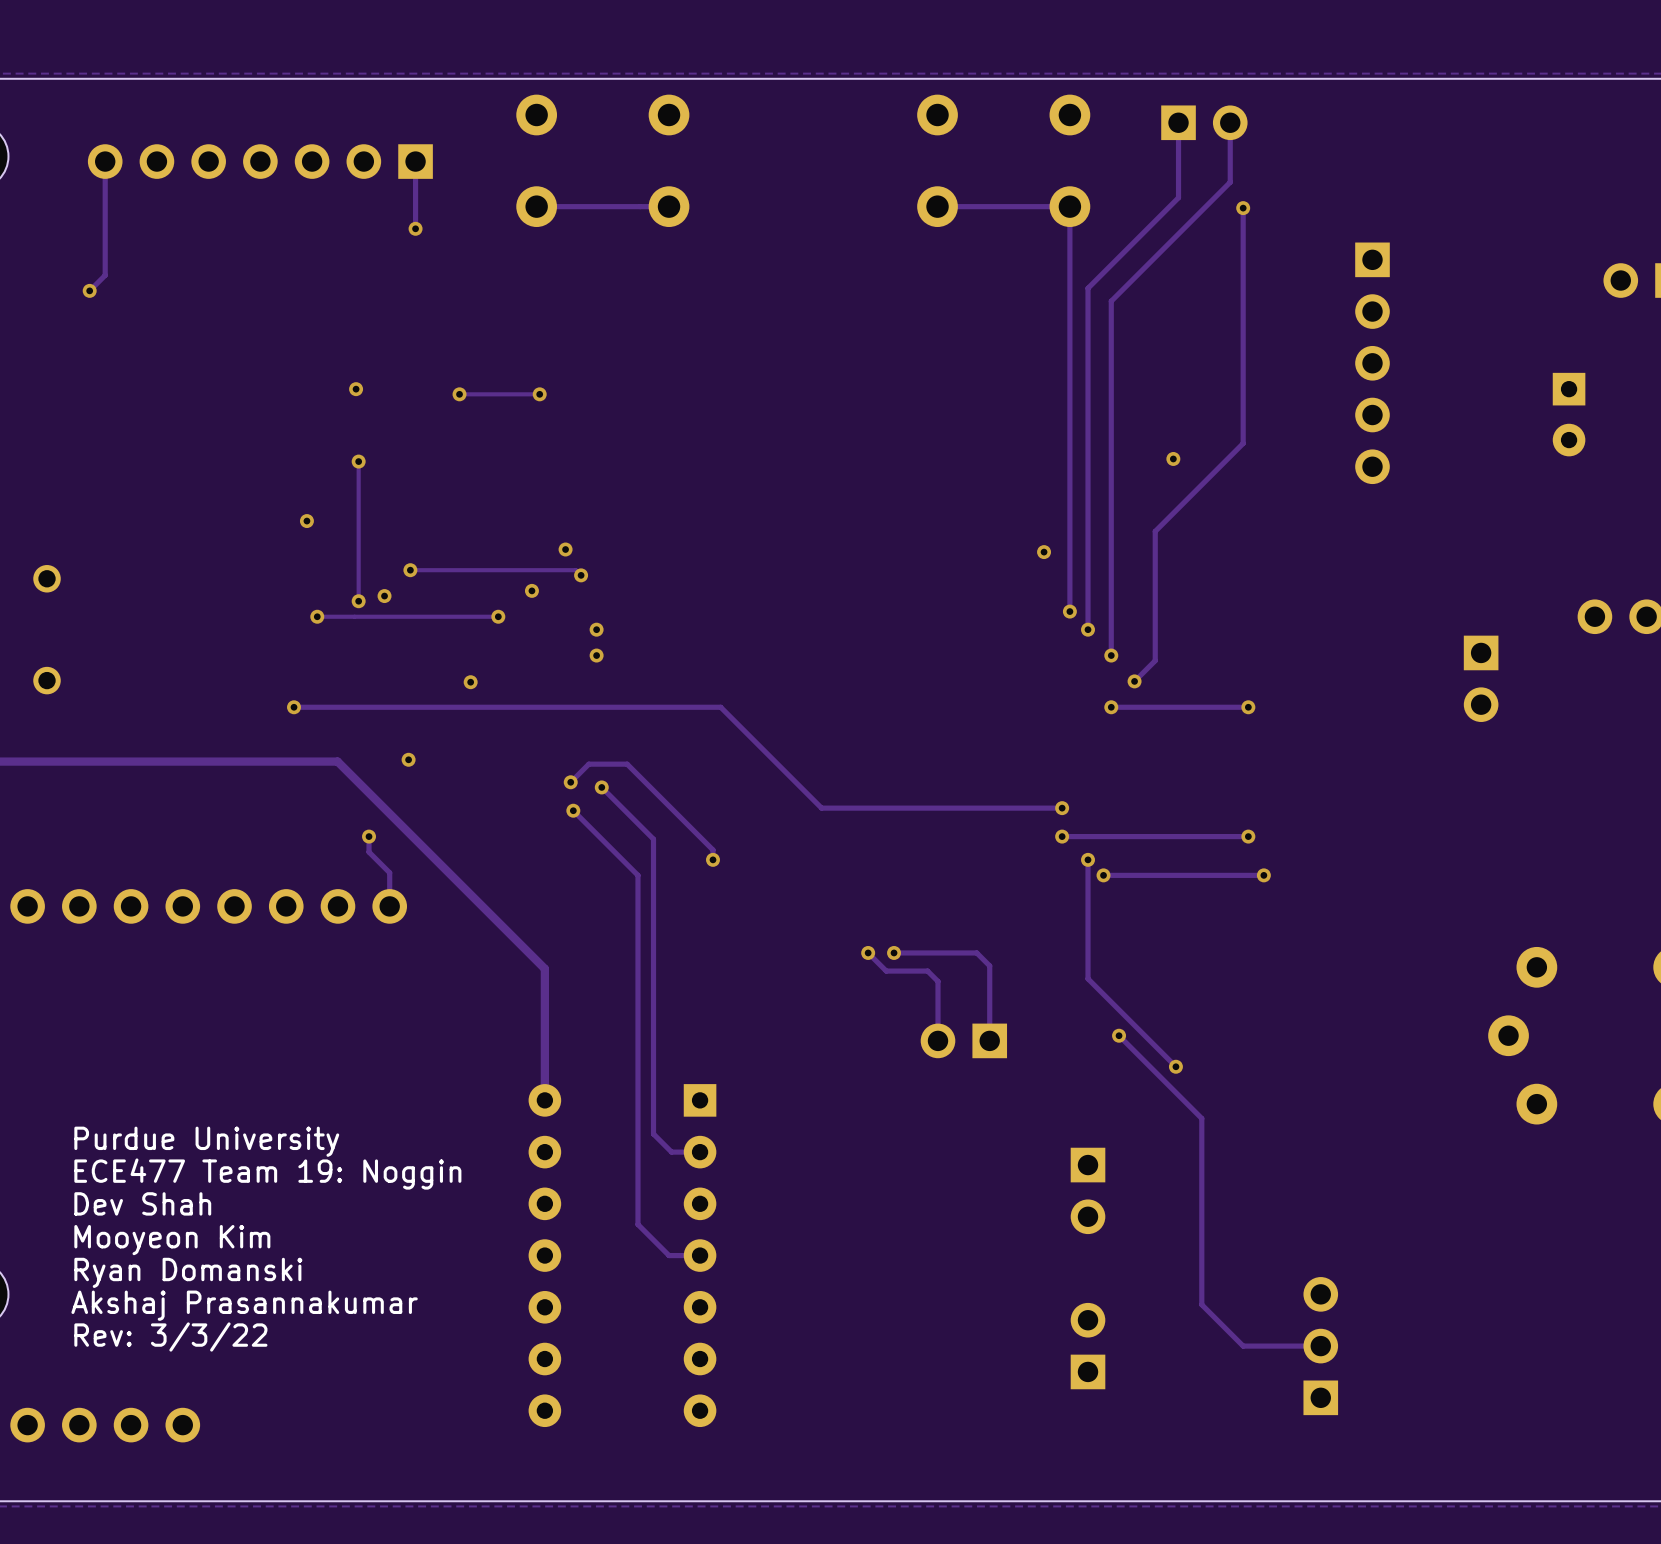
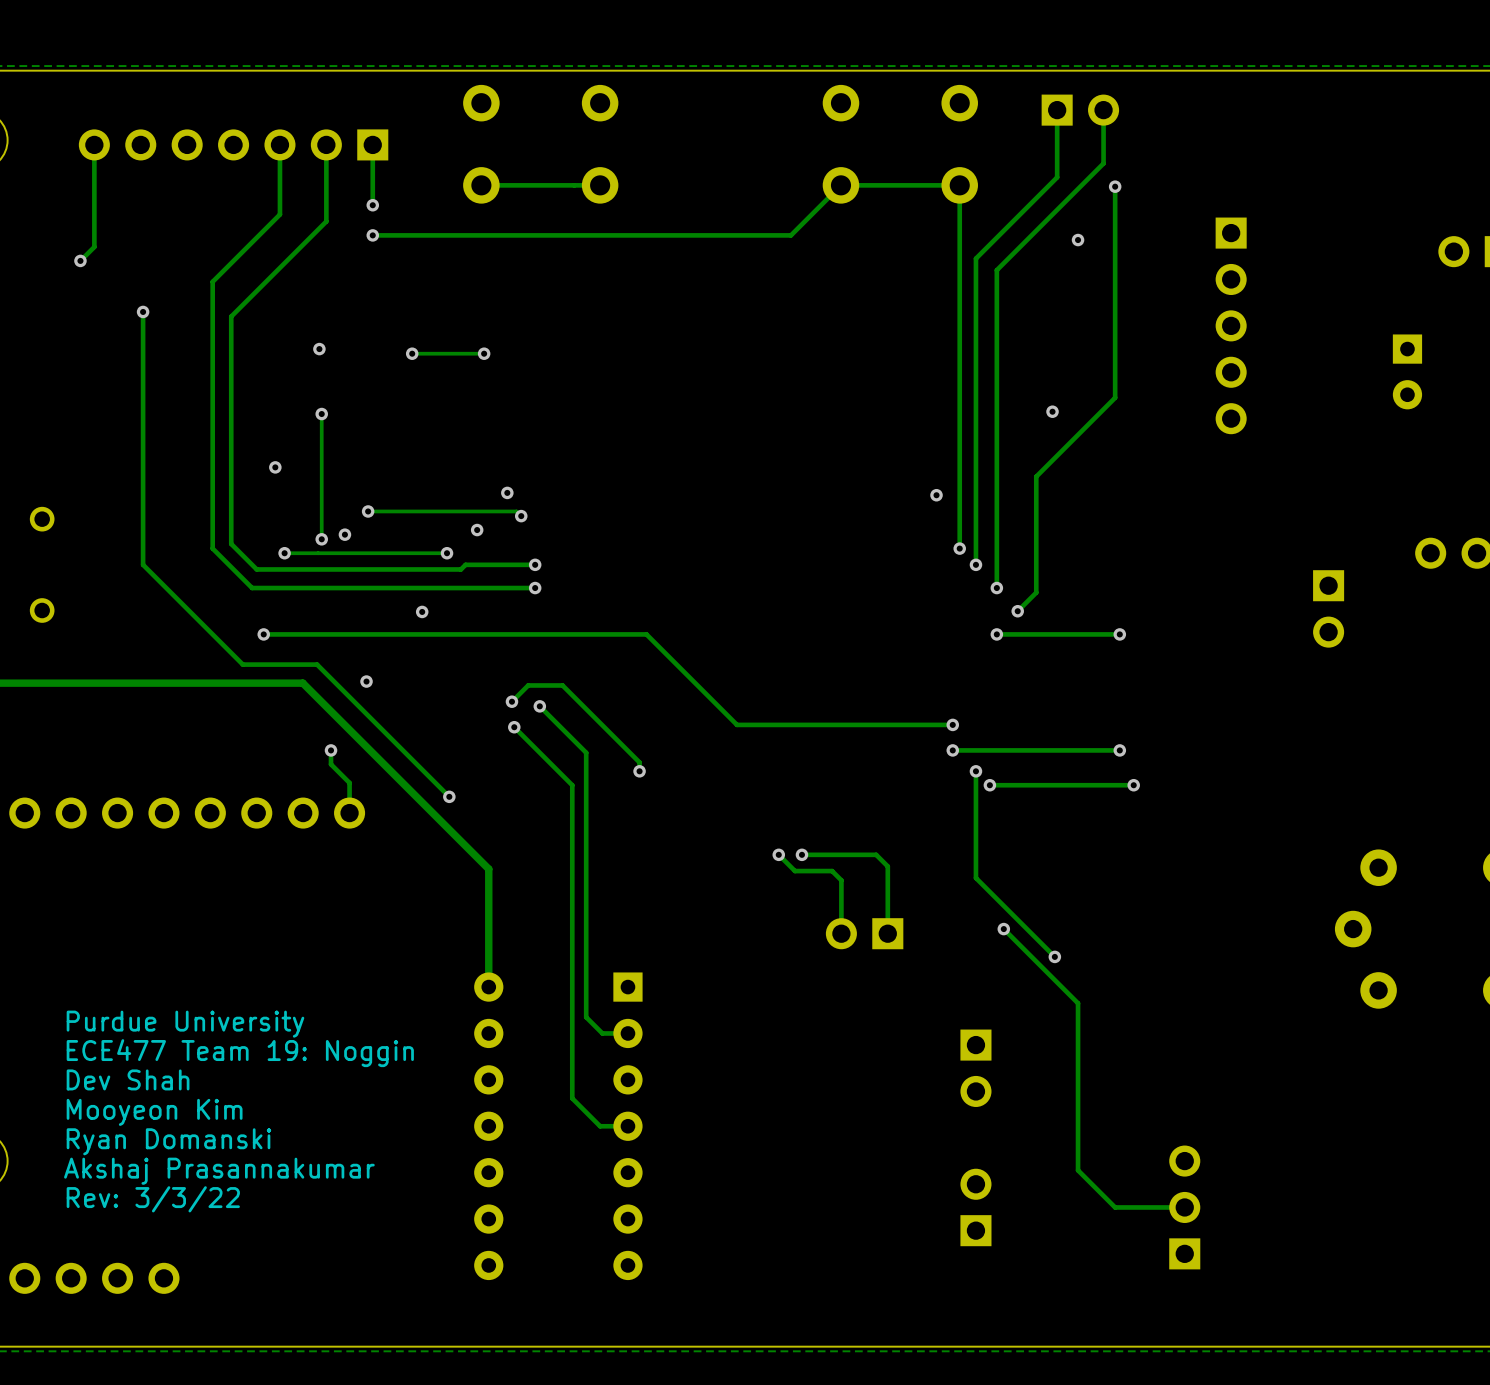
track: none -> (279, 144) (279, 214) (212, 281) (212, 548) (252, 588) (535, 588)
track: none -> (326, 144) (326, 221) (231, 316) (231, 543) (256, 569) (460, 569) (465, 564) (535, 564)
track: none -> (840, 185) (790, 235) (372, 235)
via: none -> (372, 235)
via: none -> (1078, 240)
track: none -> (143, 311) (143, 564) (242, 664) (317, 664) (449, 796)
via: none -> (143, 311)
via: none -> (449, 796)

